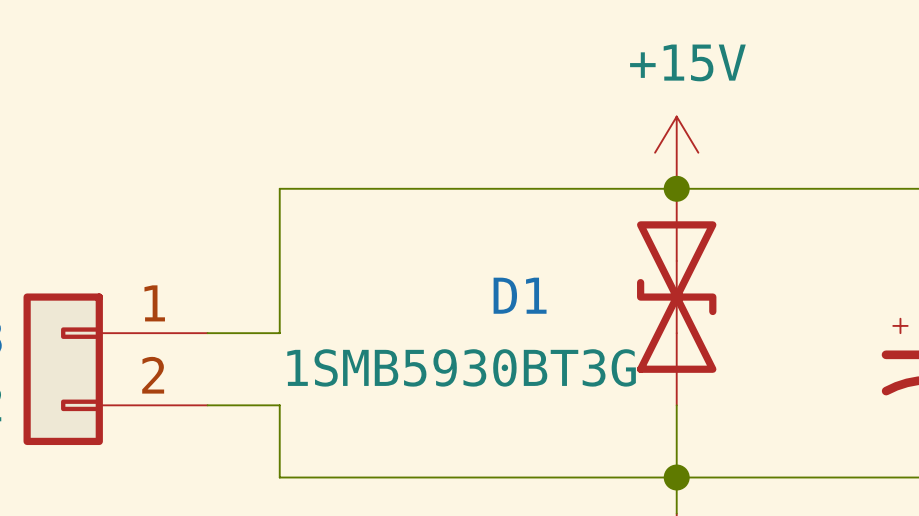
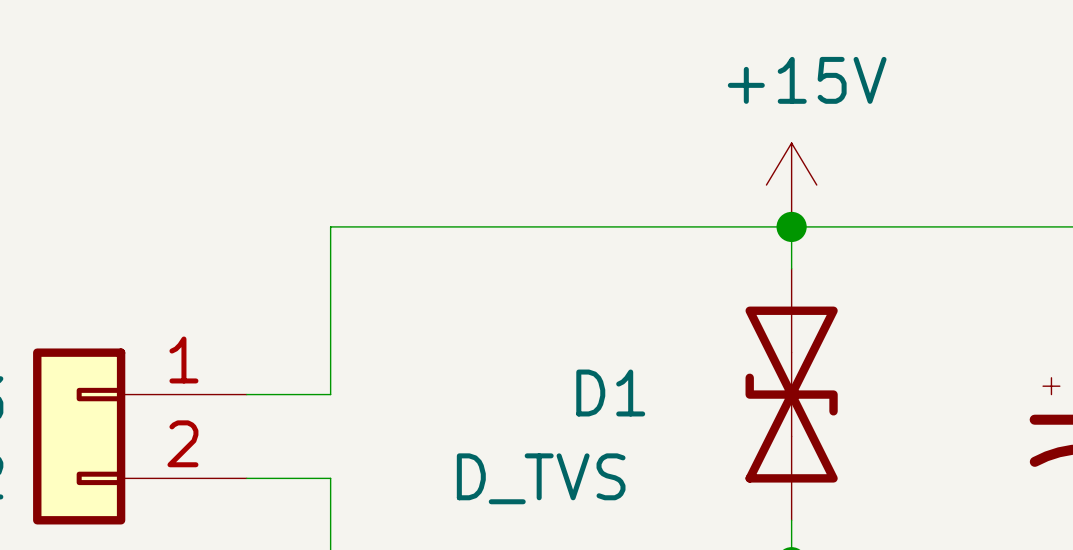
D1 position: (676, 297) -> (791, 394)
D1 value: 1SMB5930BT3G (461, 367) -> D_TVS (541, 478)

